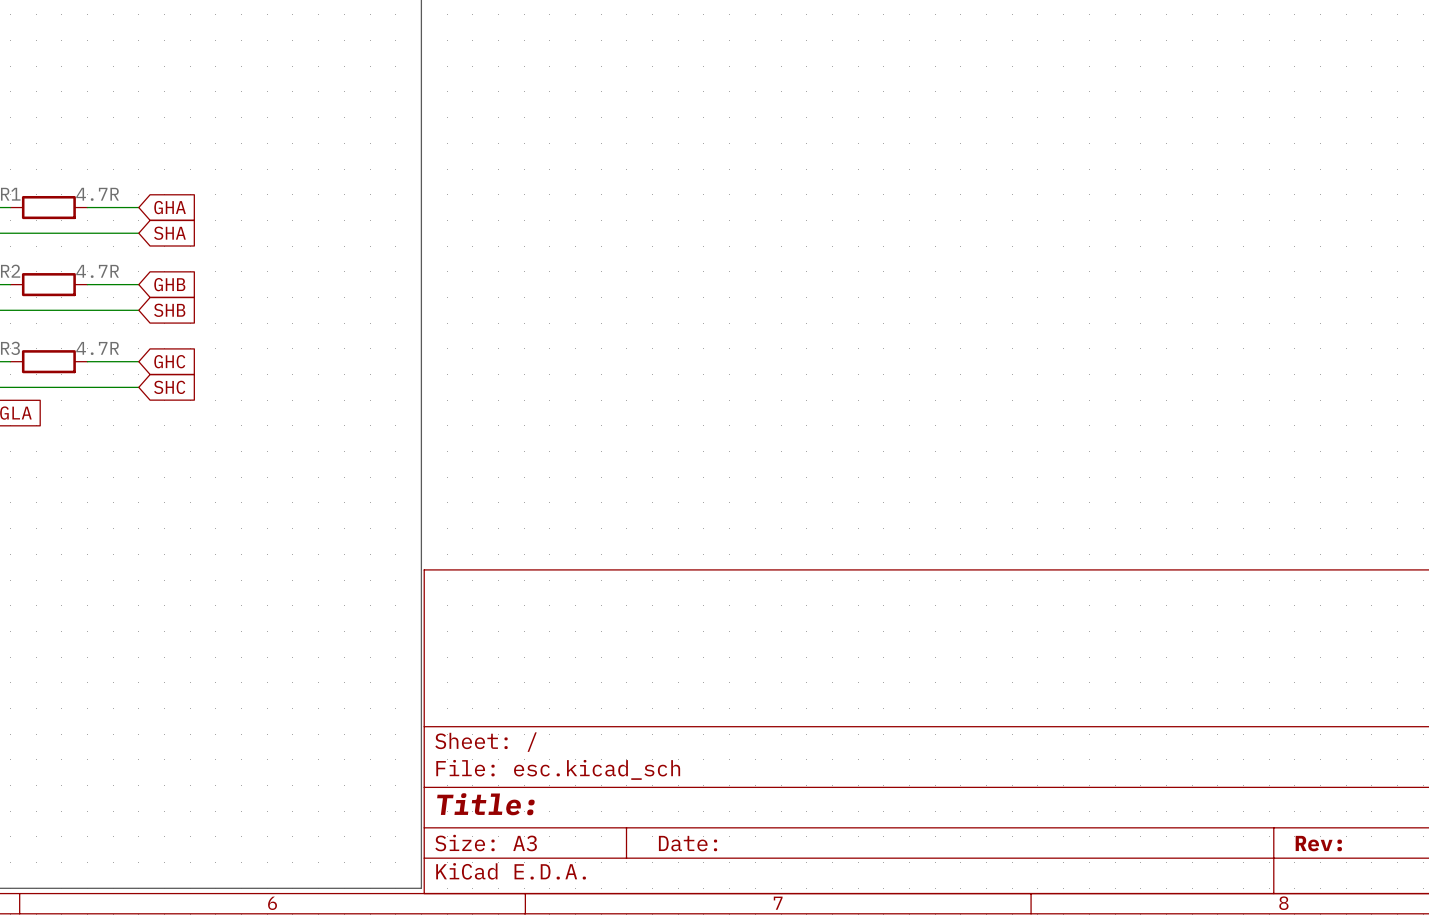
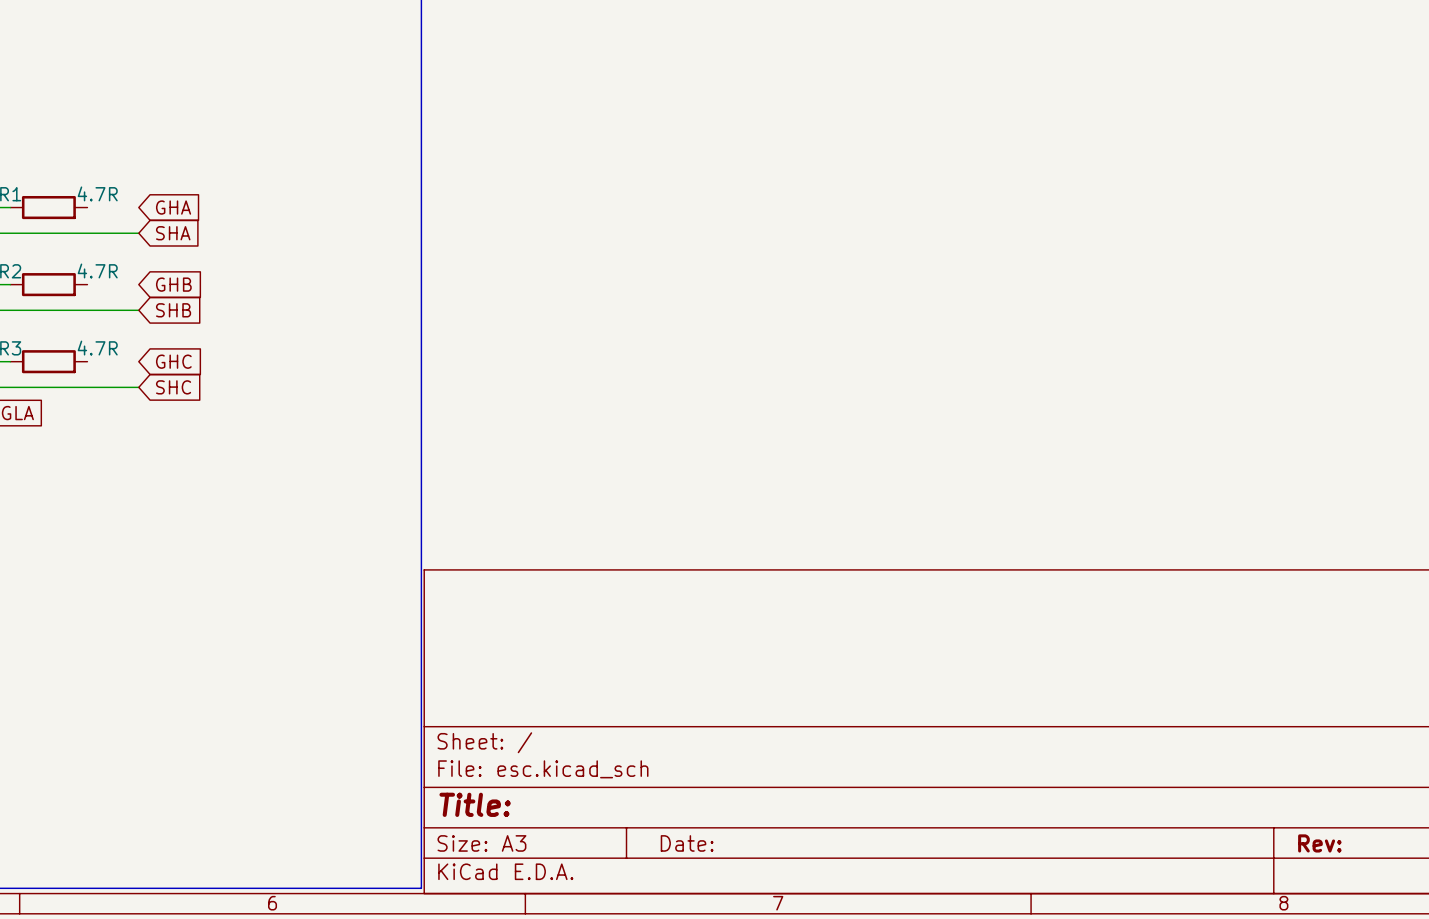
wire: (87, 207) (138, 207) -> none
wire: (87, 284) (138, 284) -> none
wire: (87, 361) (138, 361) -> none

